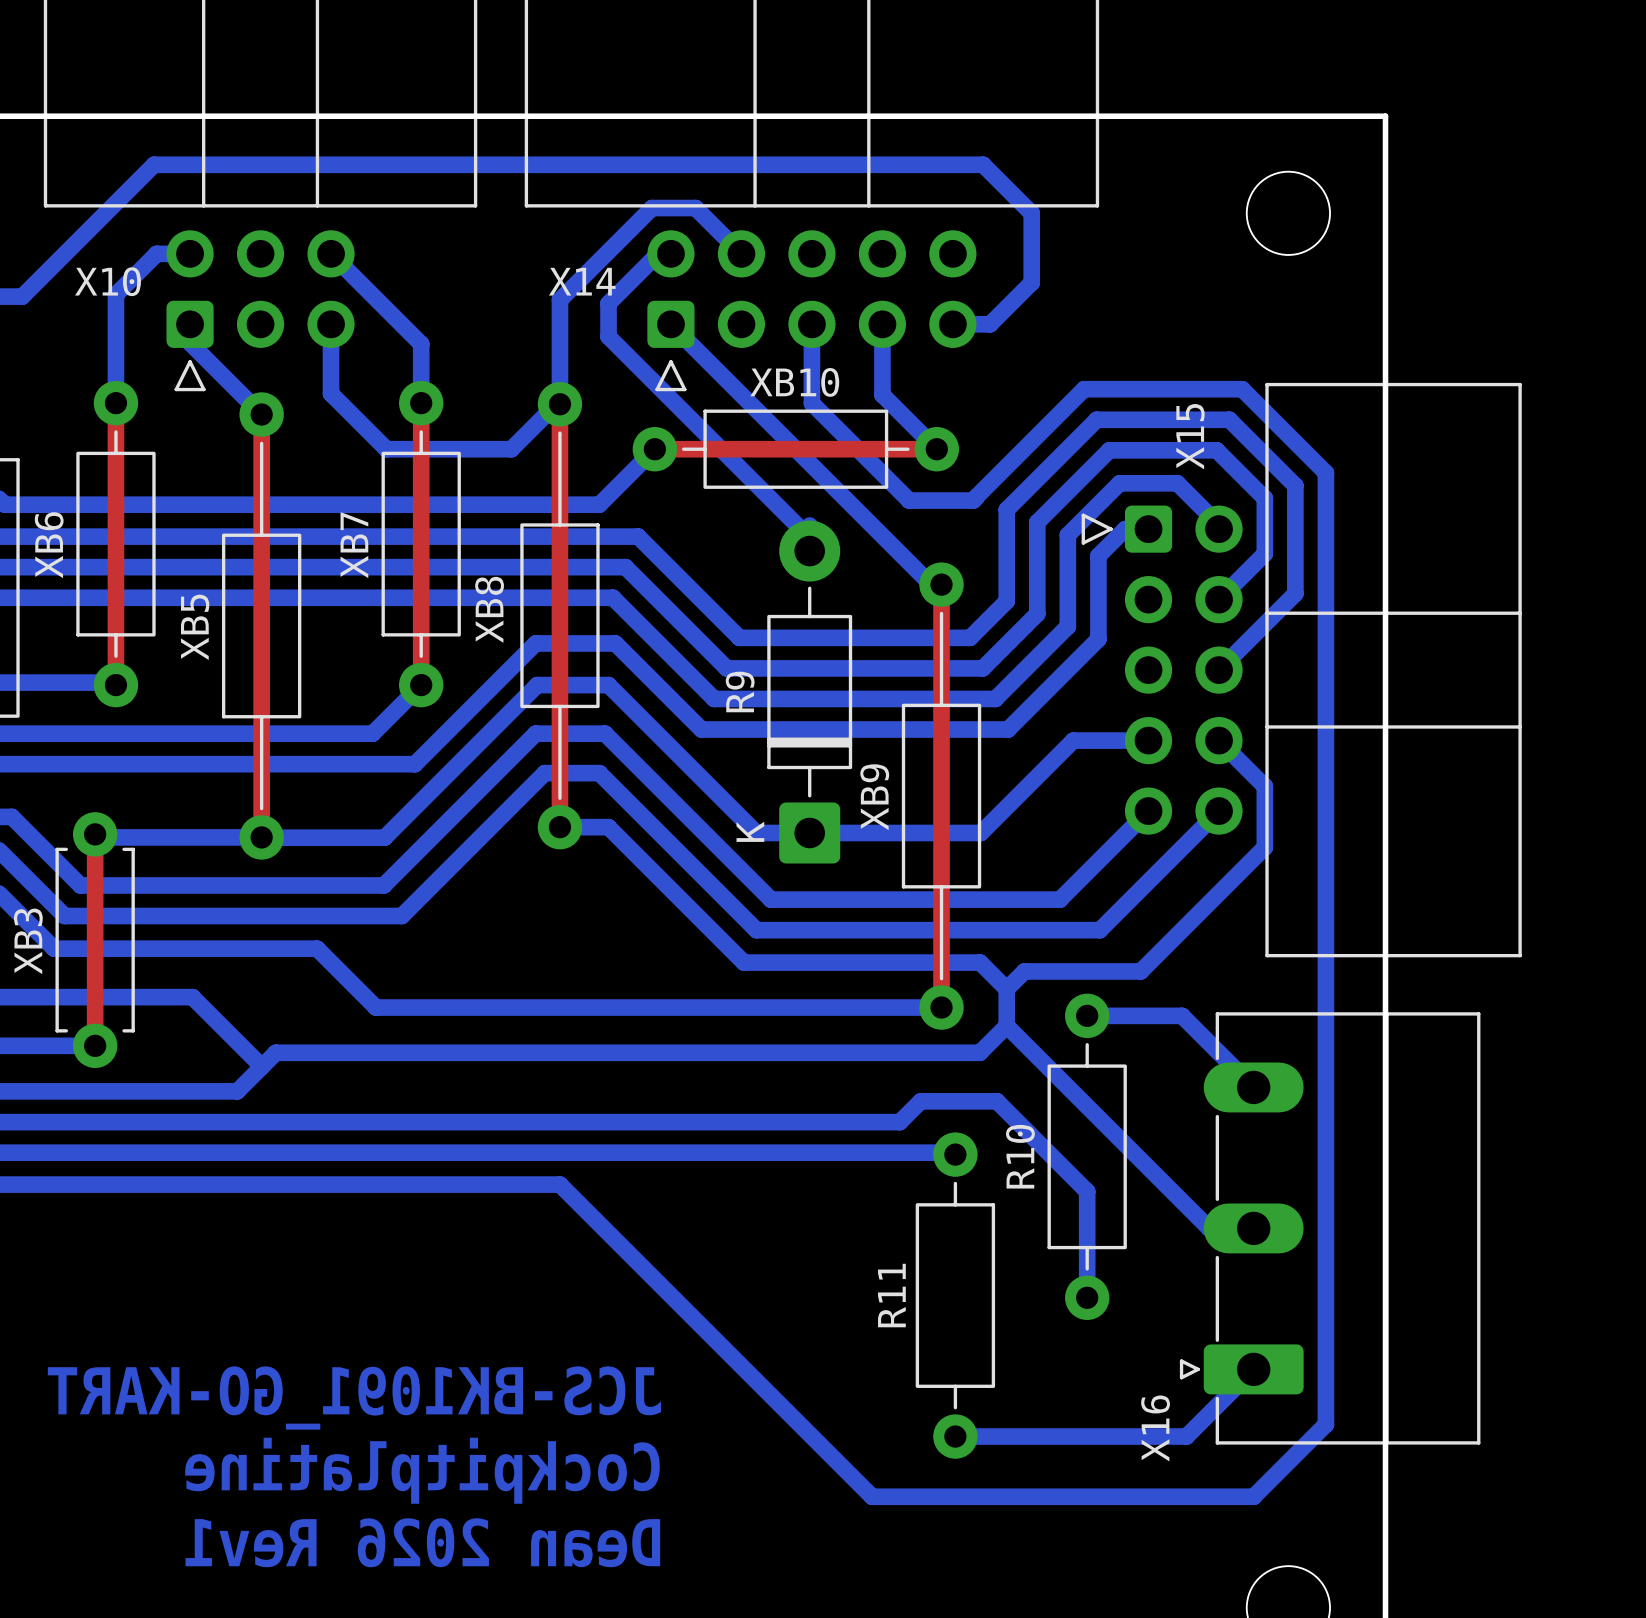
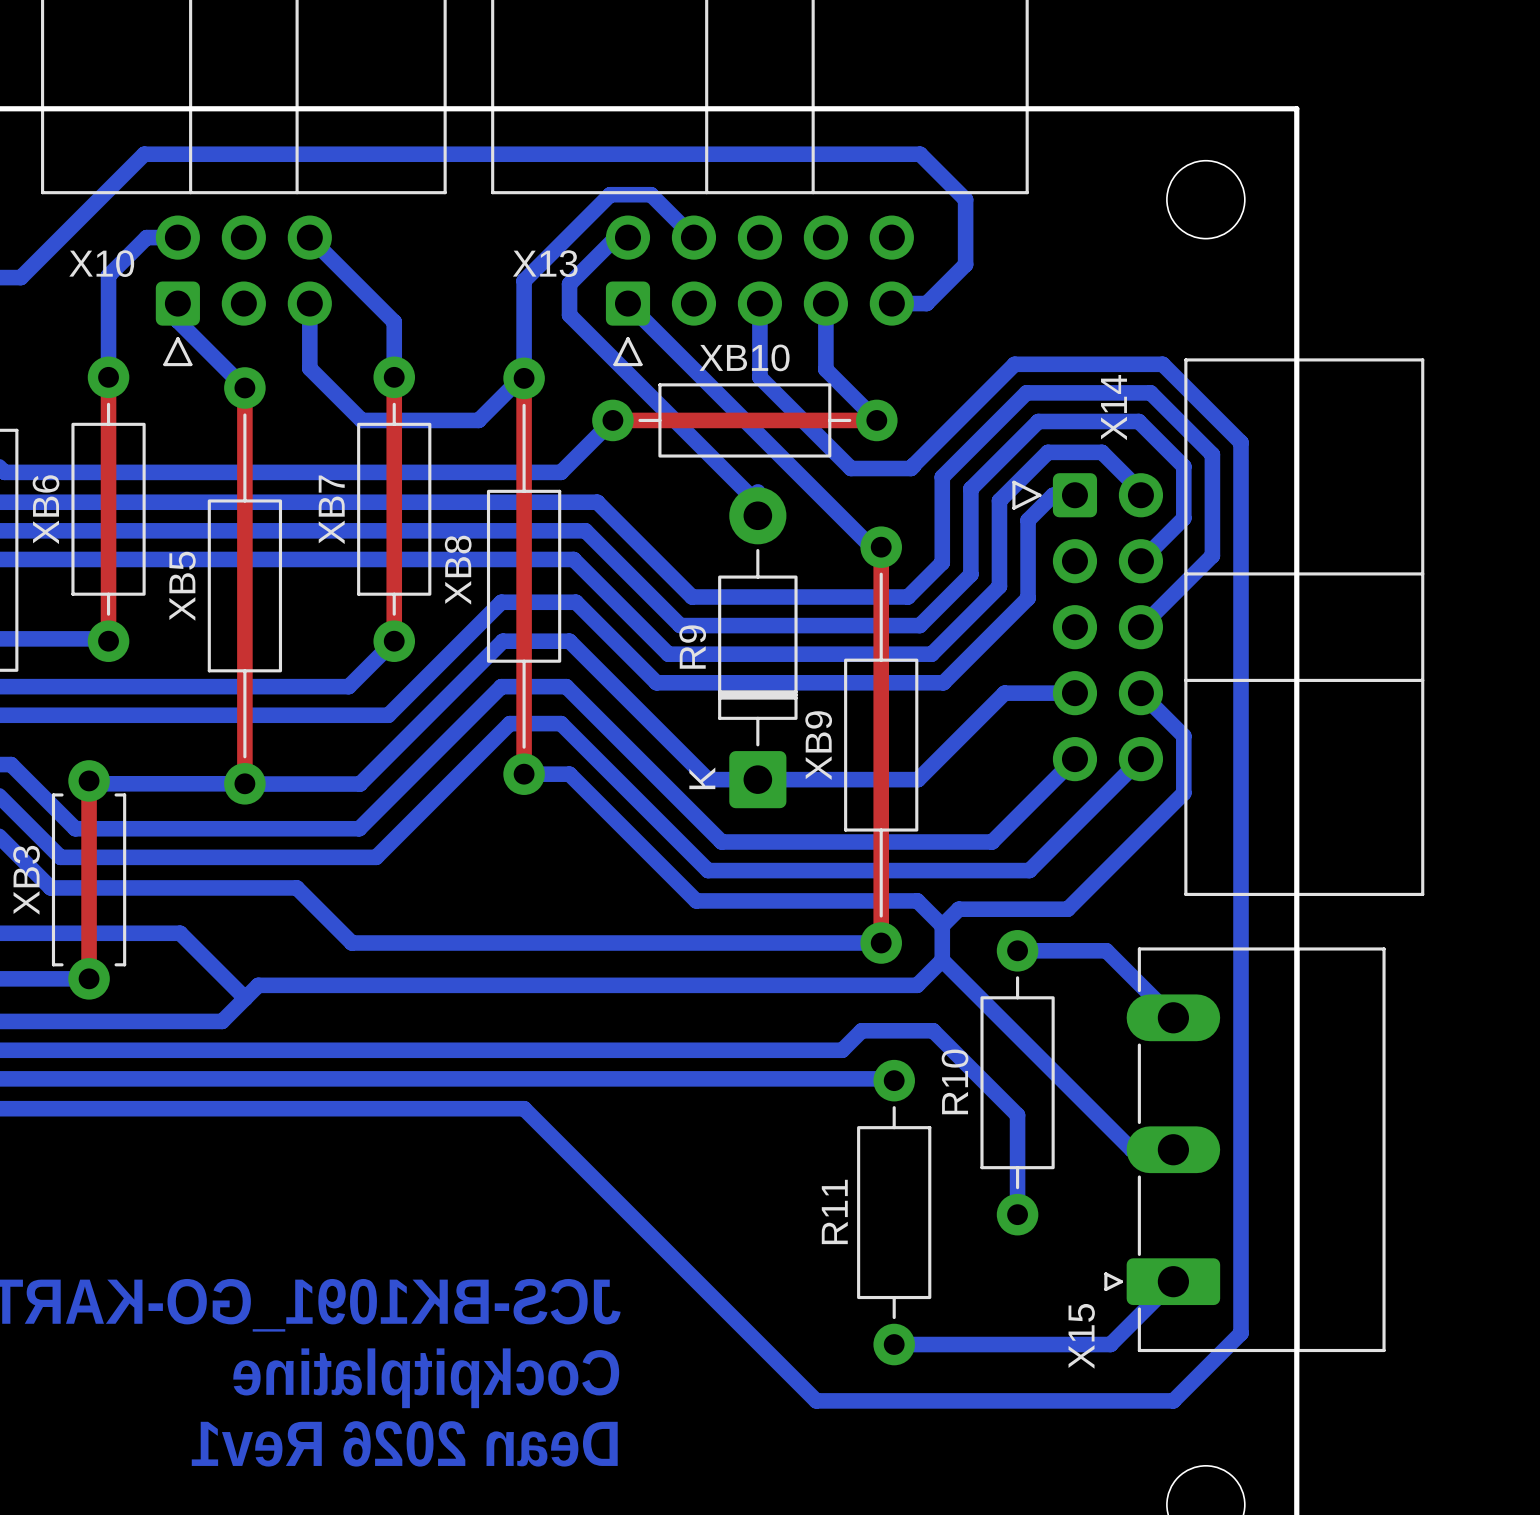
X14 name: X14 (582, 281) -> X13 (545, 263)
X15 name: X15 (1190, 436) -> X14 (1113, 407)
X16 name: X16 (1155, 1428) -> X15 (1081, 1336)

